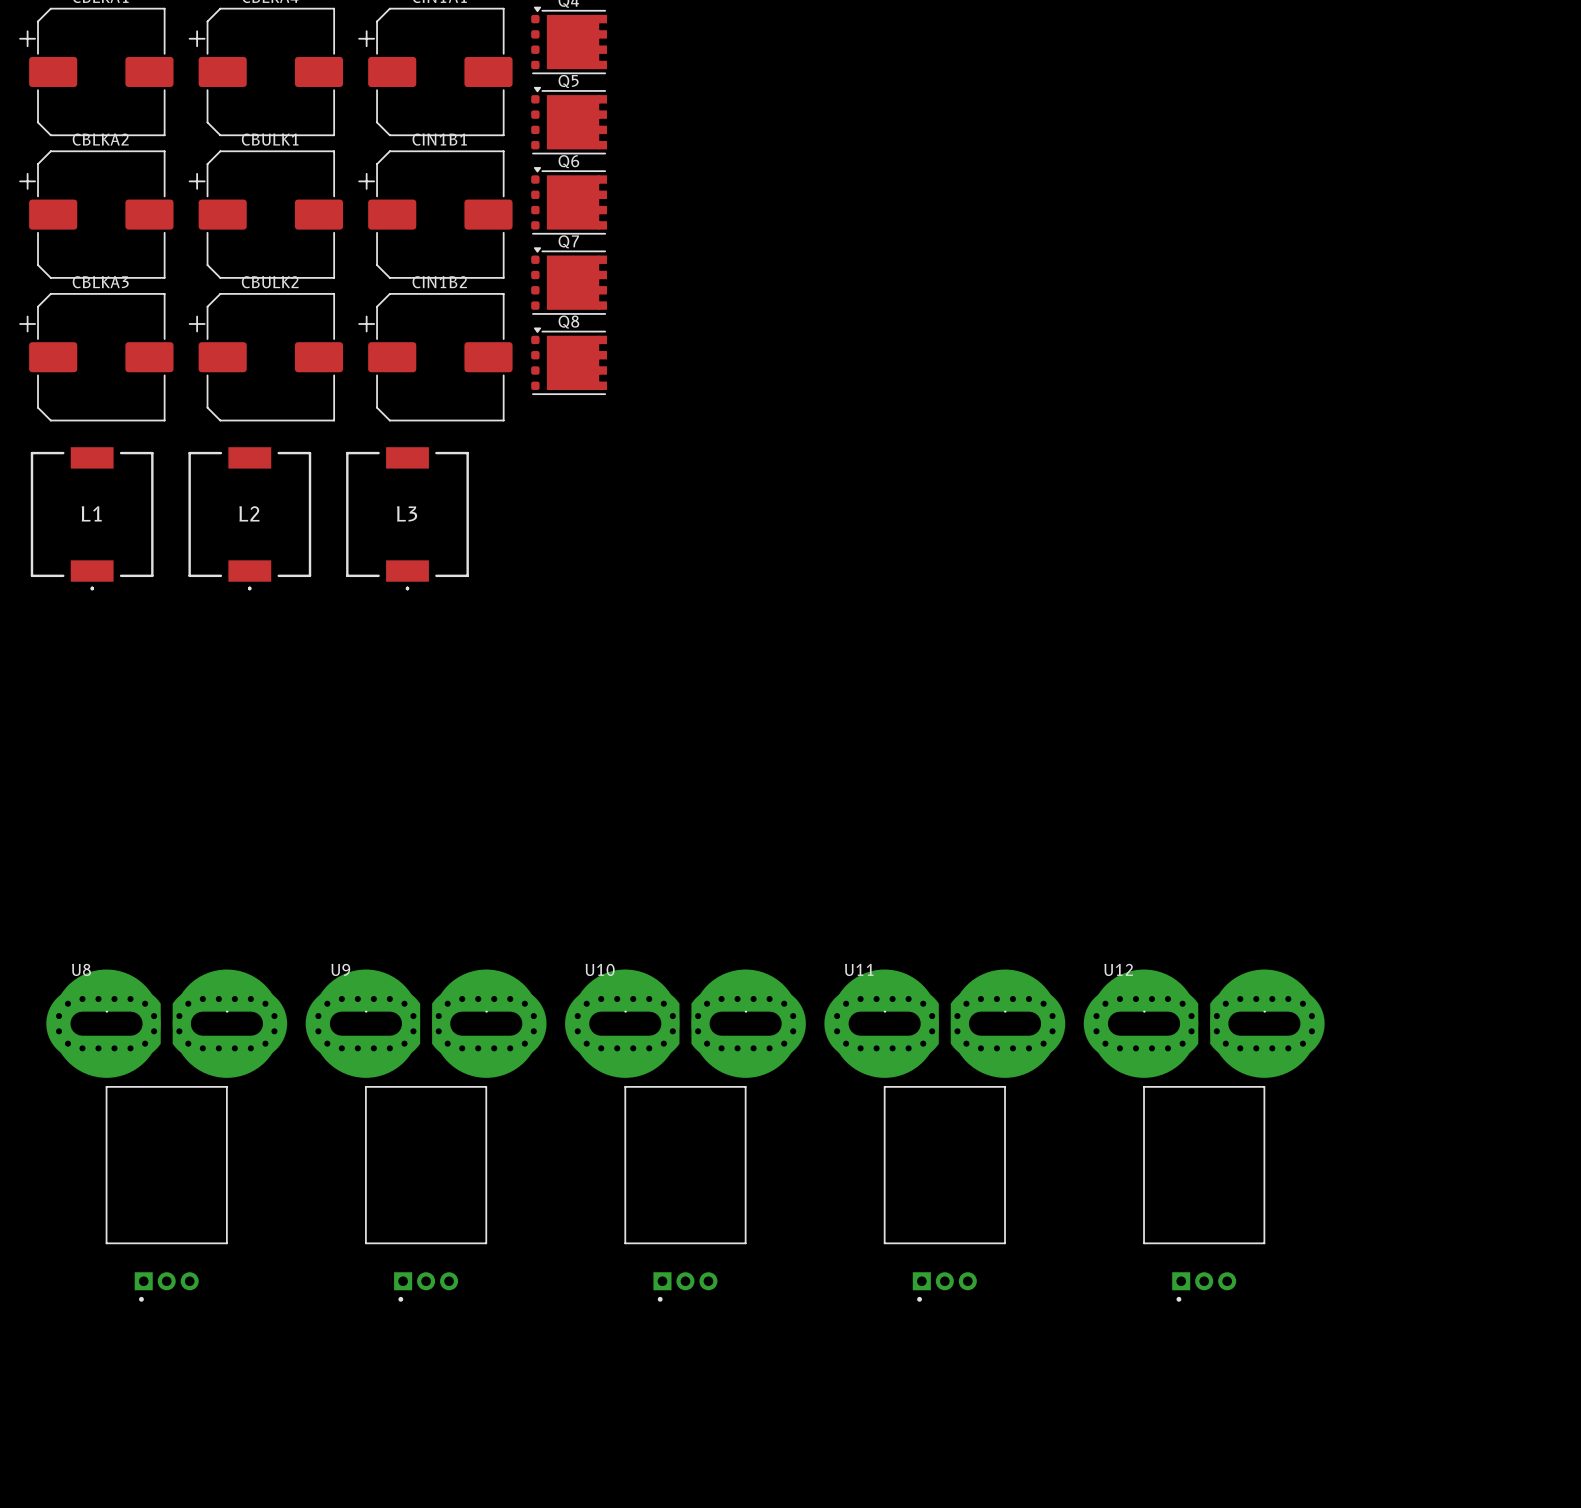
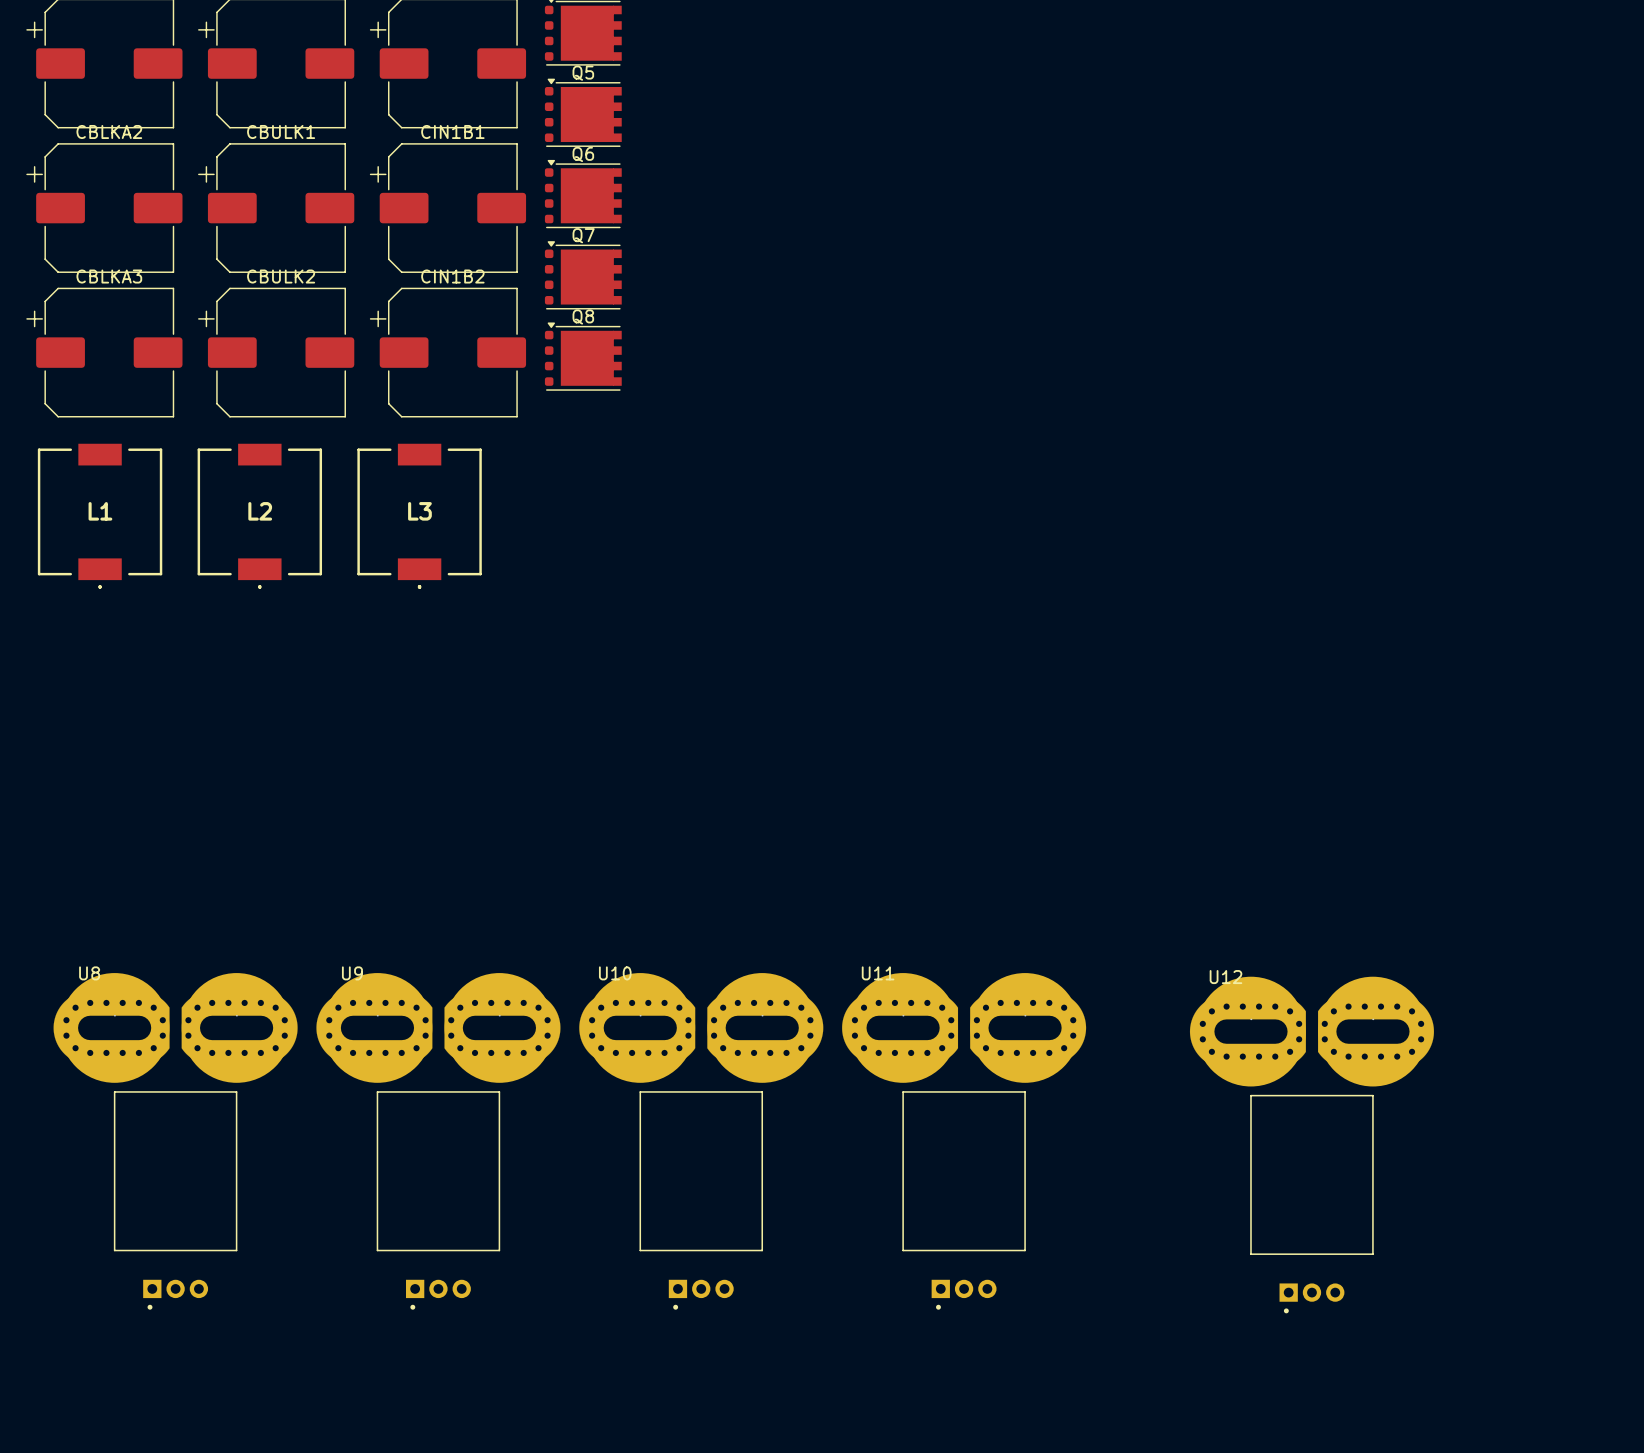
U12 position: (1204, 1135) -> (1311, 1145)

